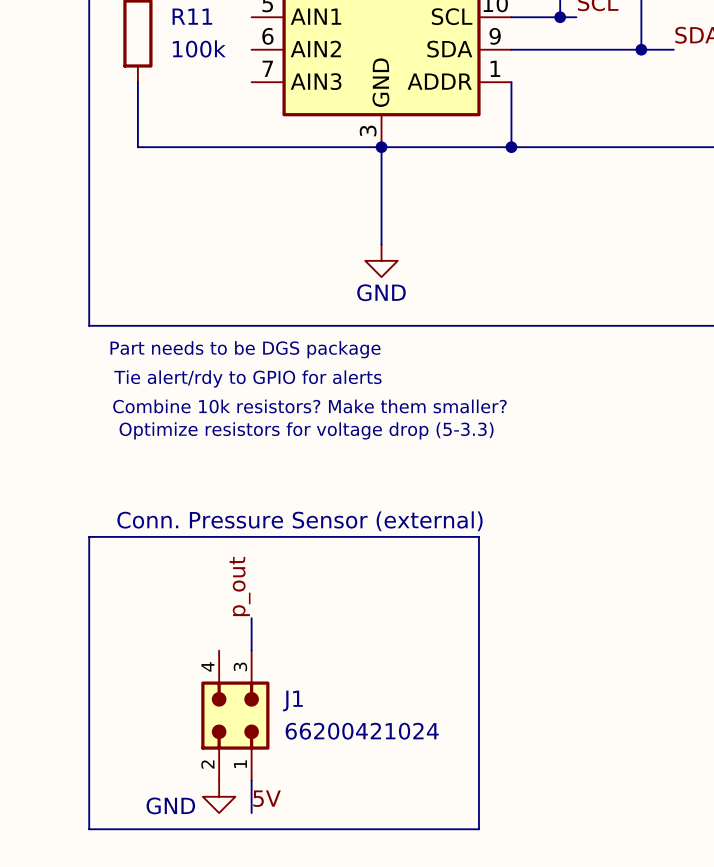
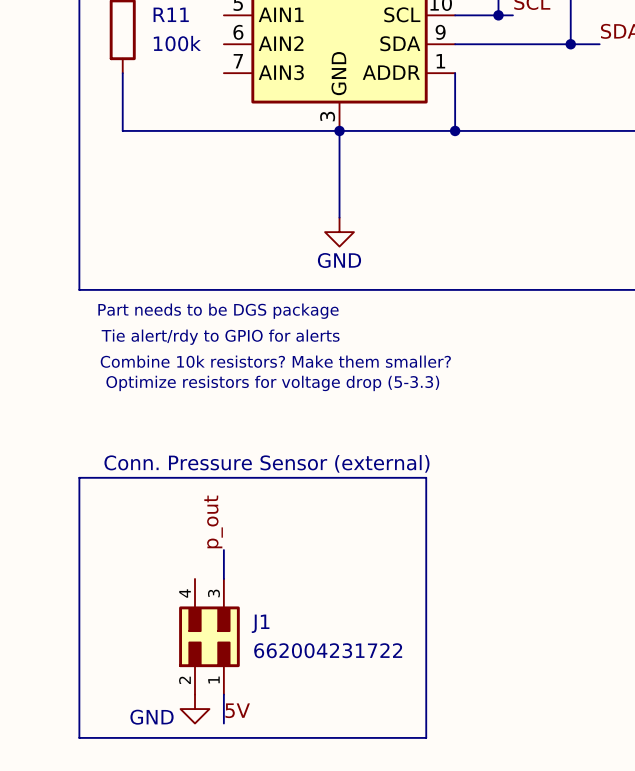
J1 symbol: [201, 650, 270, 781] -> [179, 578, 240, 695]
J1 value: 66200421024 (362, 731) -> 662004231722 (328, 650)

